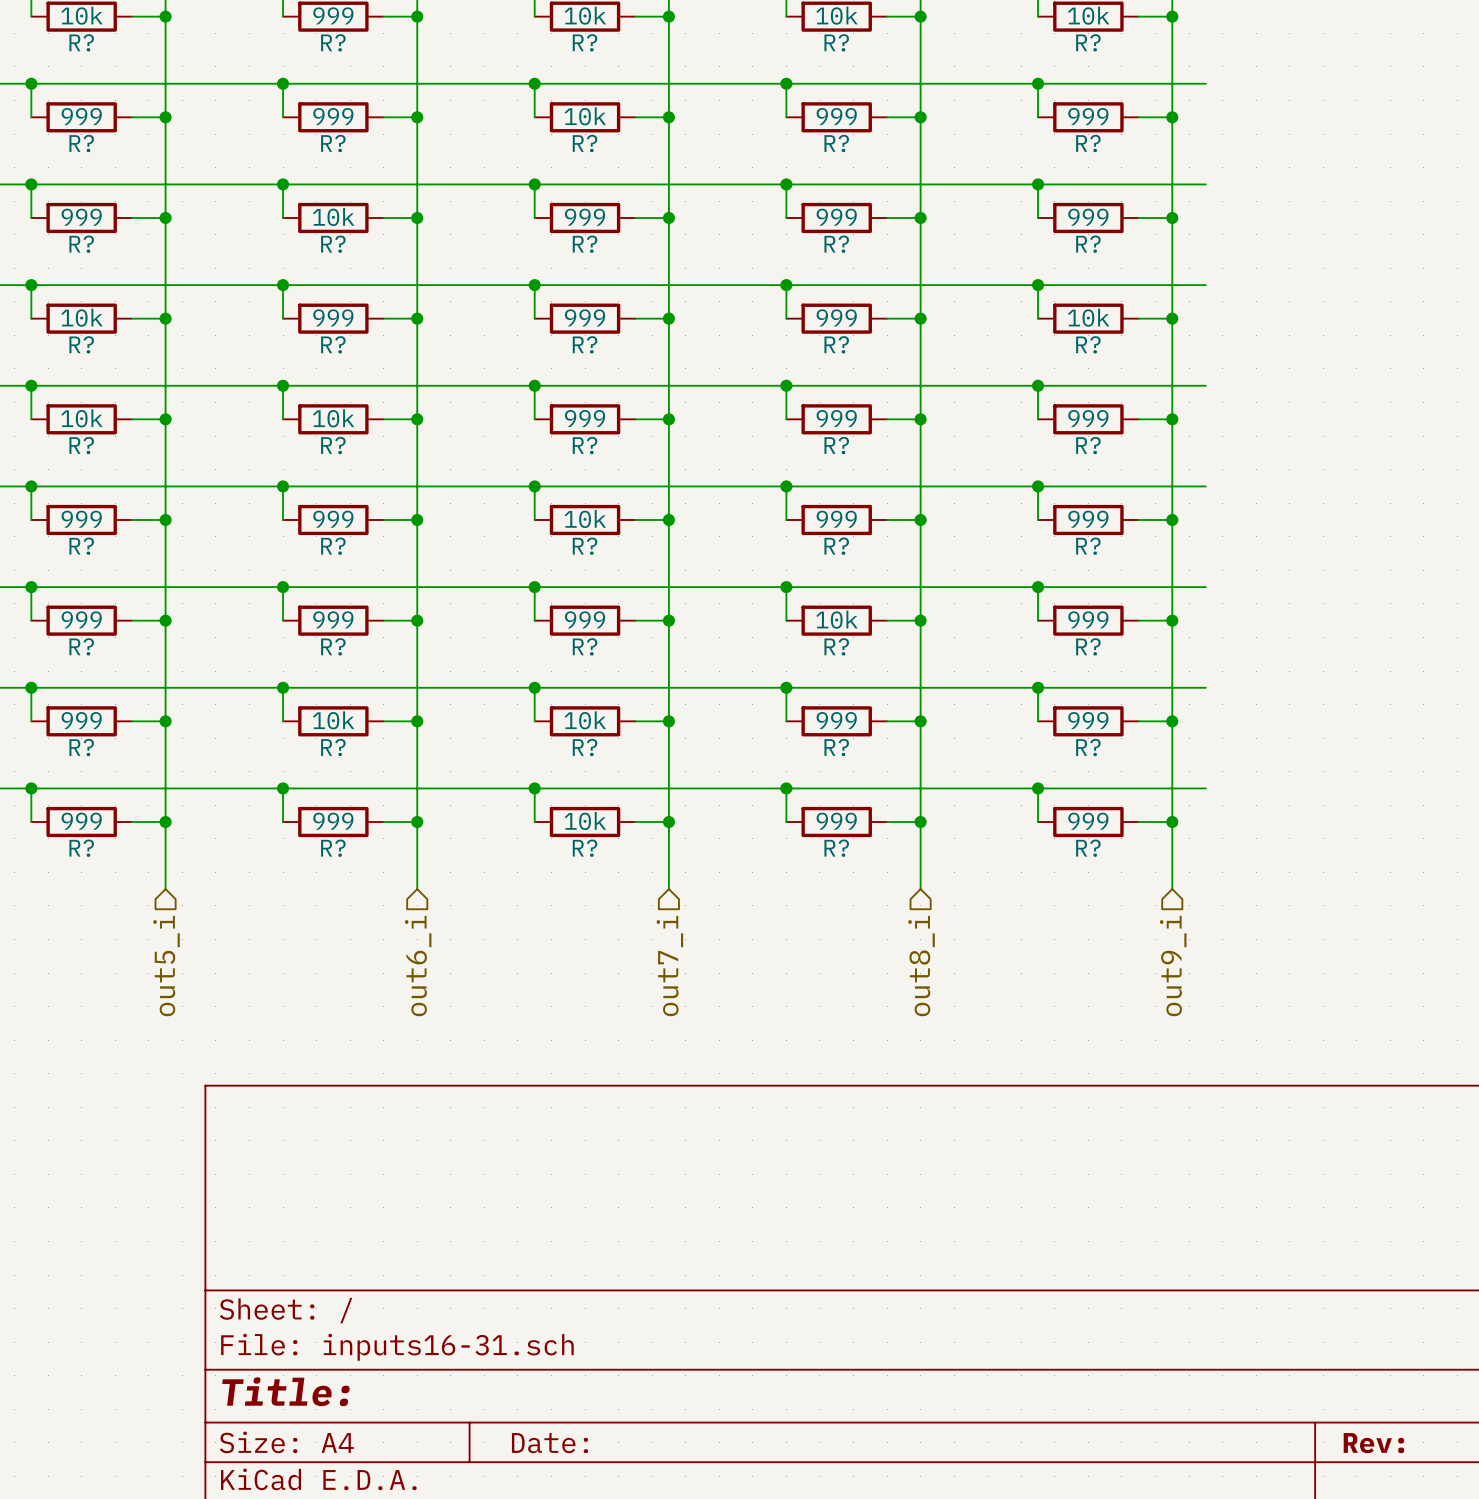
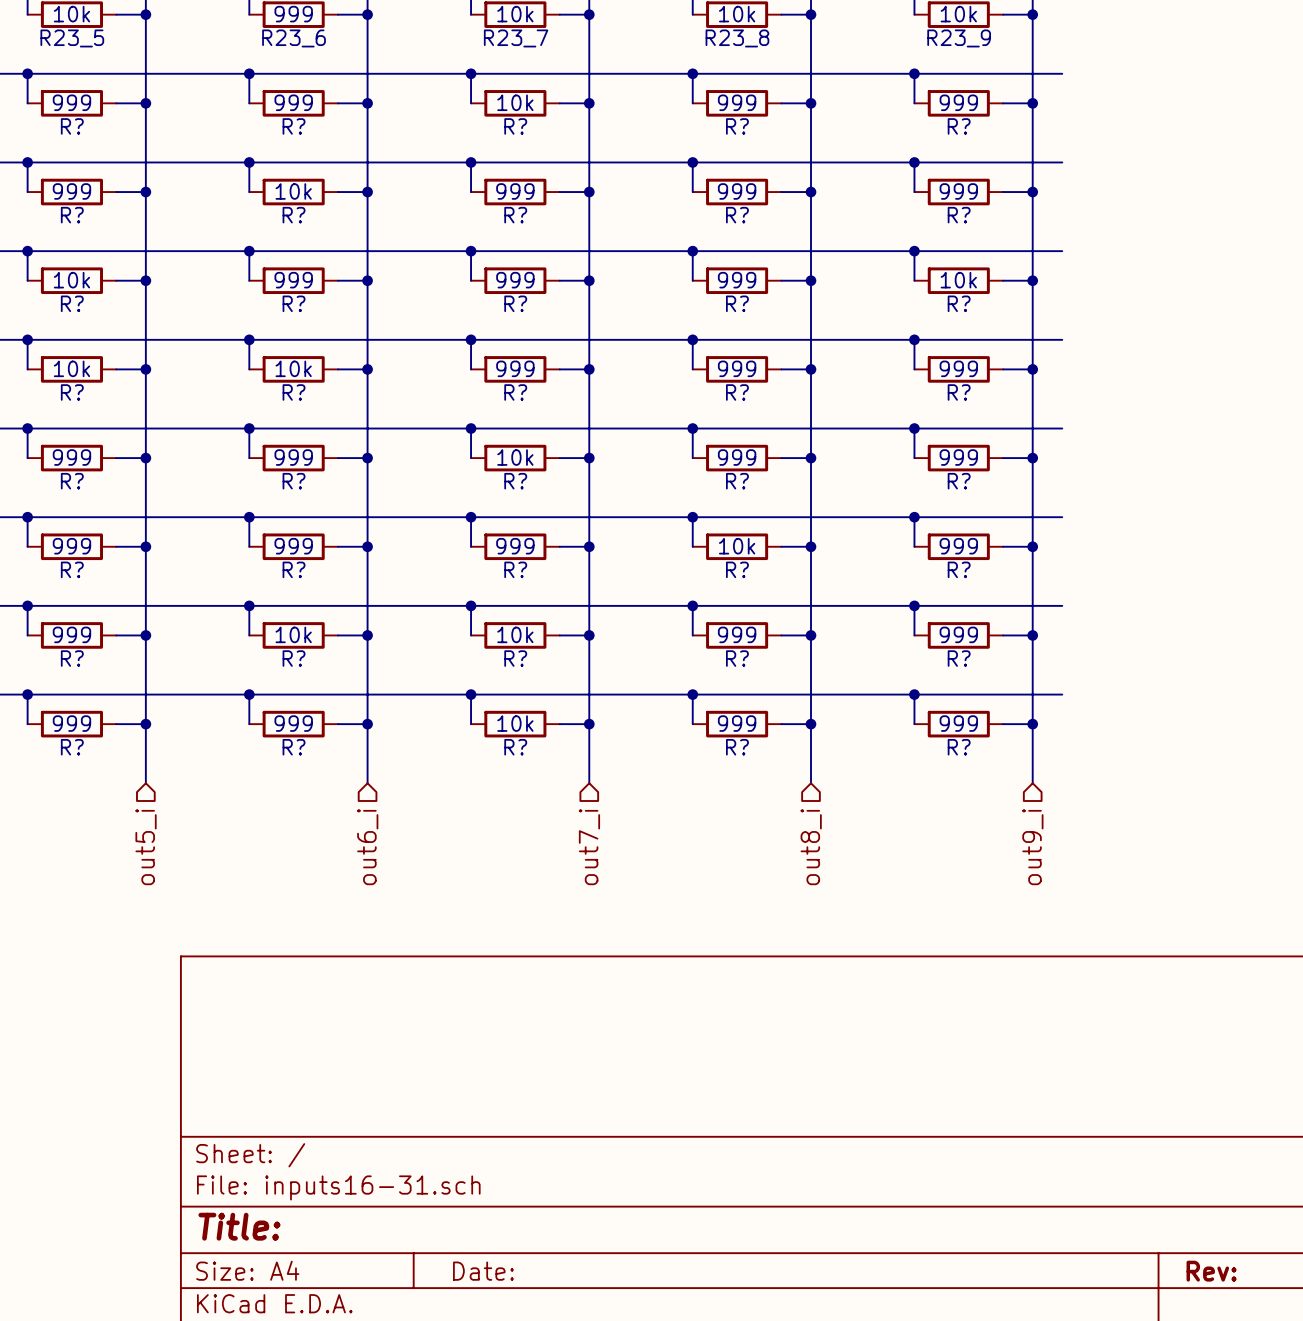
R? name: R? (81, 42) -> R23_5 (72, 38)
R? name: R? (333, 42) -> R23_6 (294, 38)
R? name: R? (585, 42) -> R23_7 (516, 38)
R? name: R? (836, 42) -> R23_8 (737, 38)
R? name: R? (1088, 42) -> R23_9 (959, 38)

